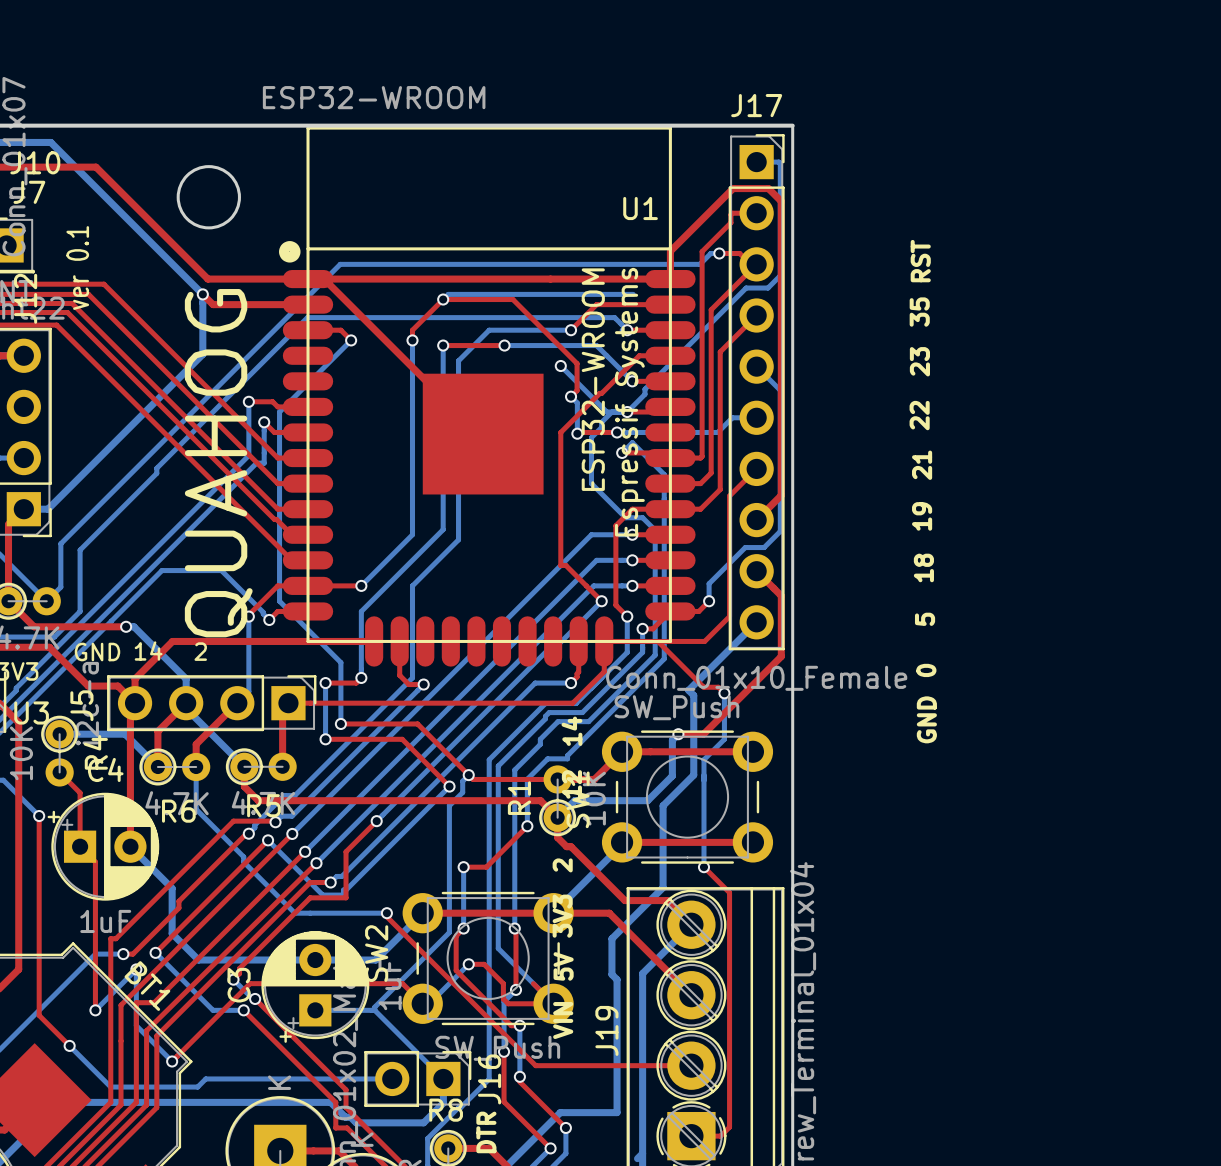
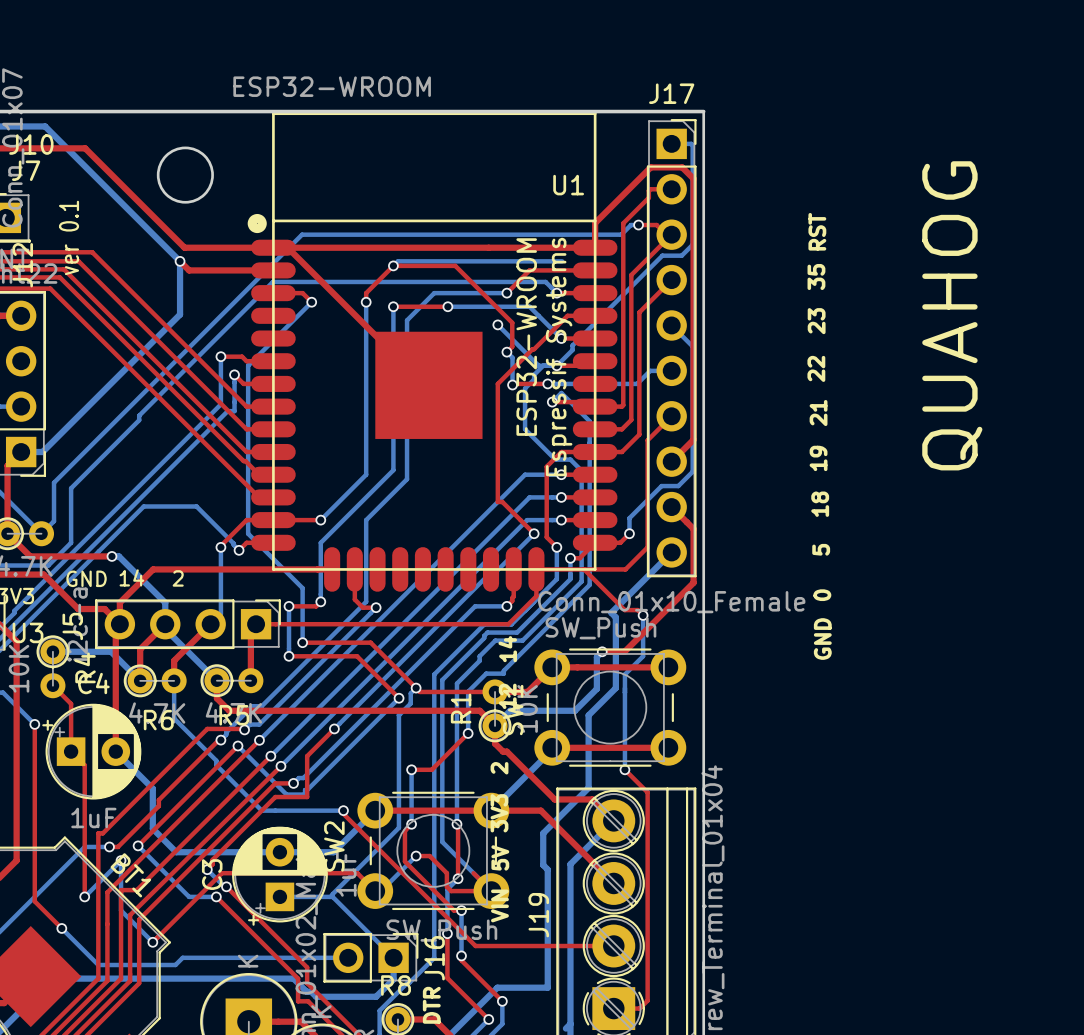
text: none -> QUAHOG (952, 315)
text: QUAHOG (218, 463) -> none

